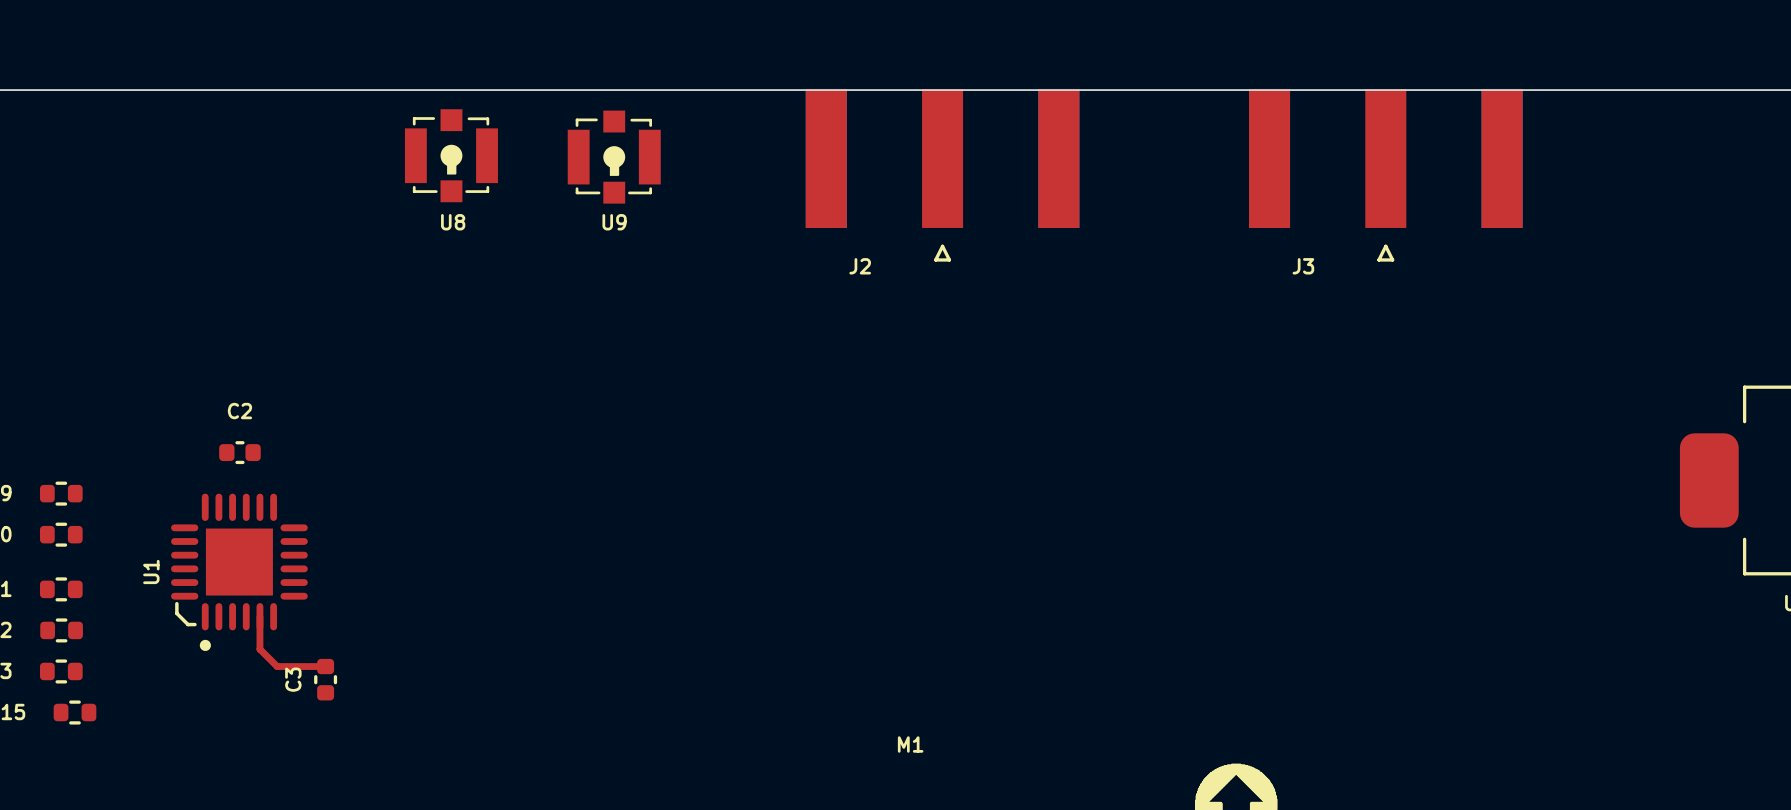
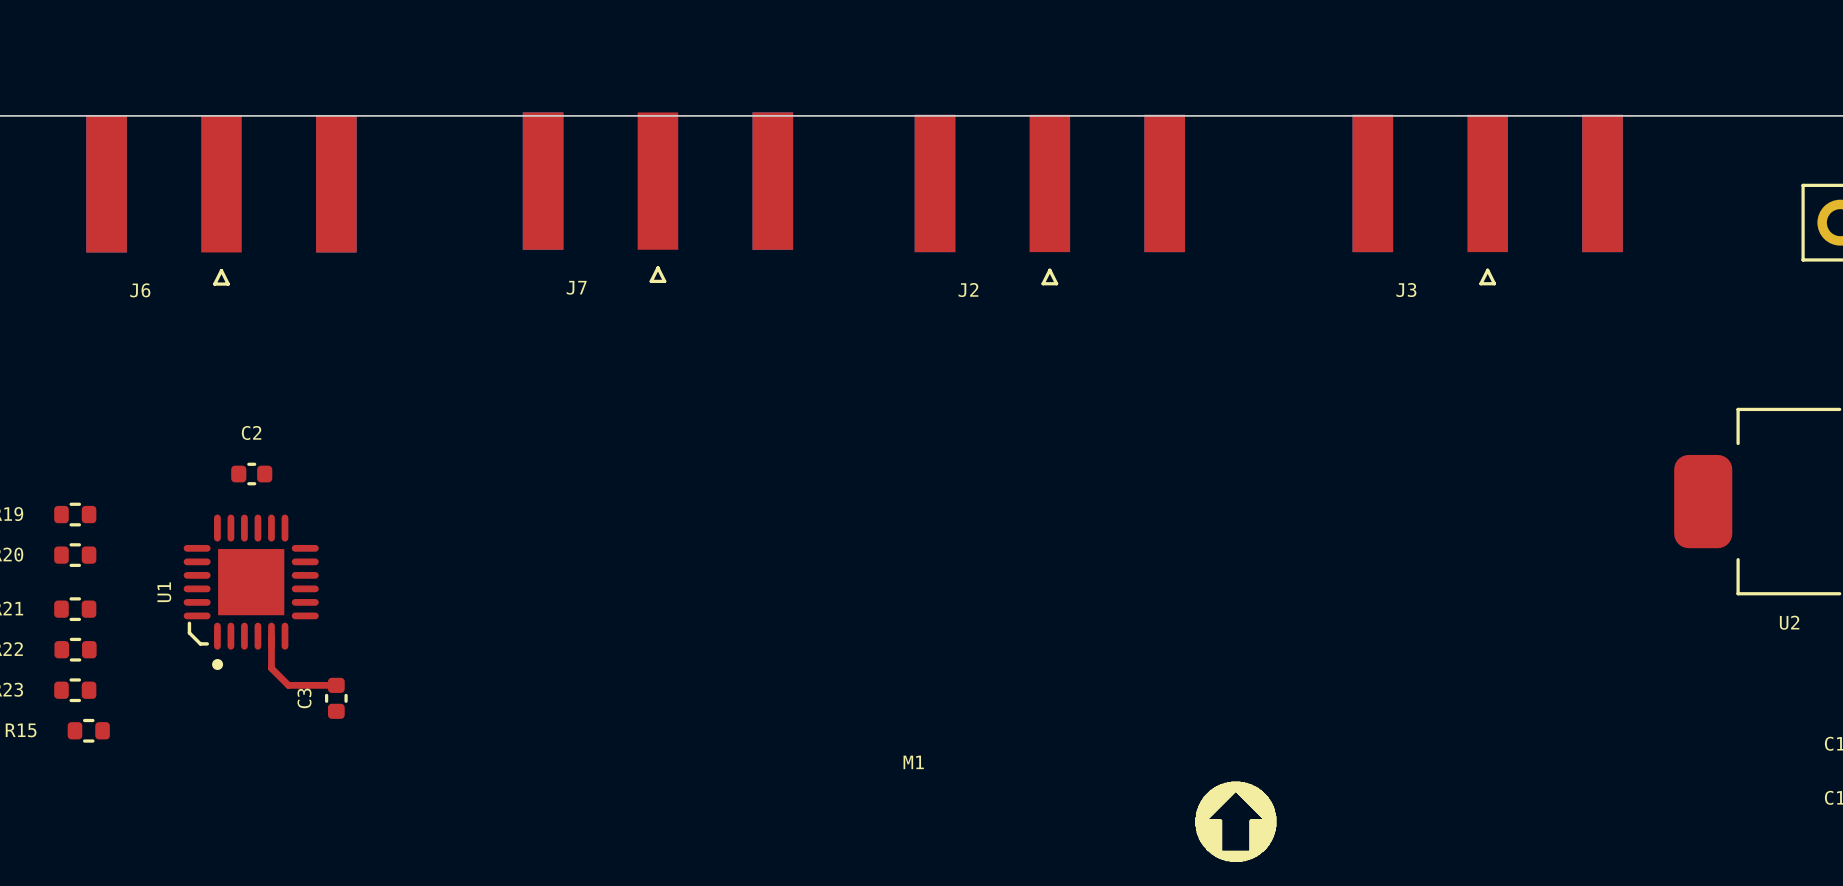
U8: (451, 155) -> none
U9: (614, 157) -> none
J7: none -> (657, 197)
J6: none -> (221, 200)
J2 position: (942, 175) -> (1049, 200)
J3 position: (1385, 175) -> (1487, 200)

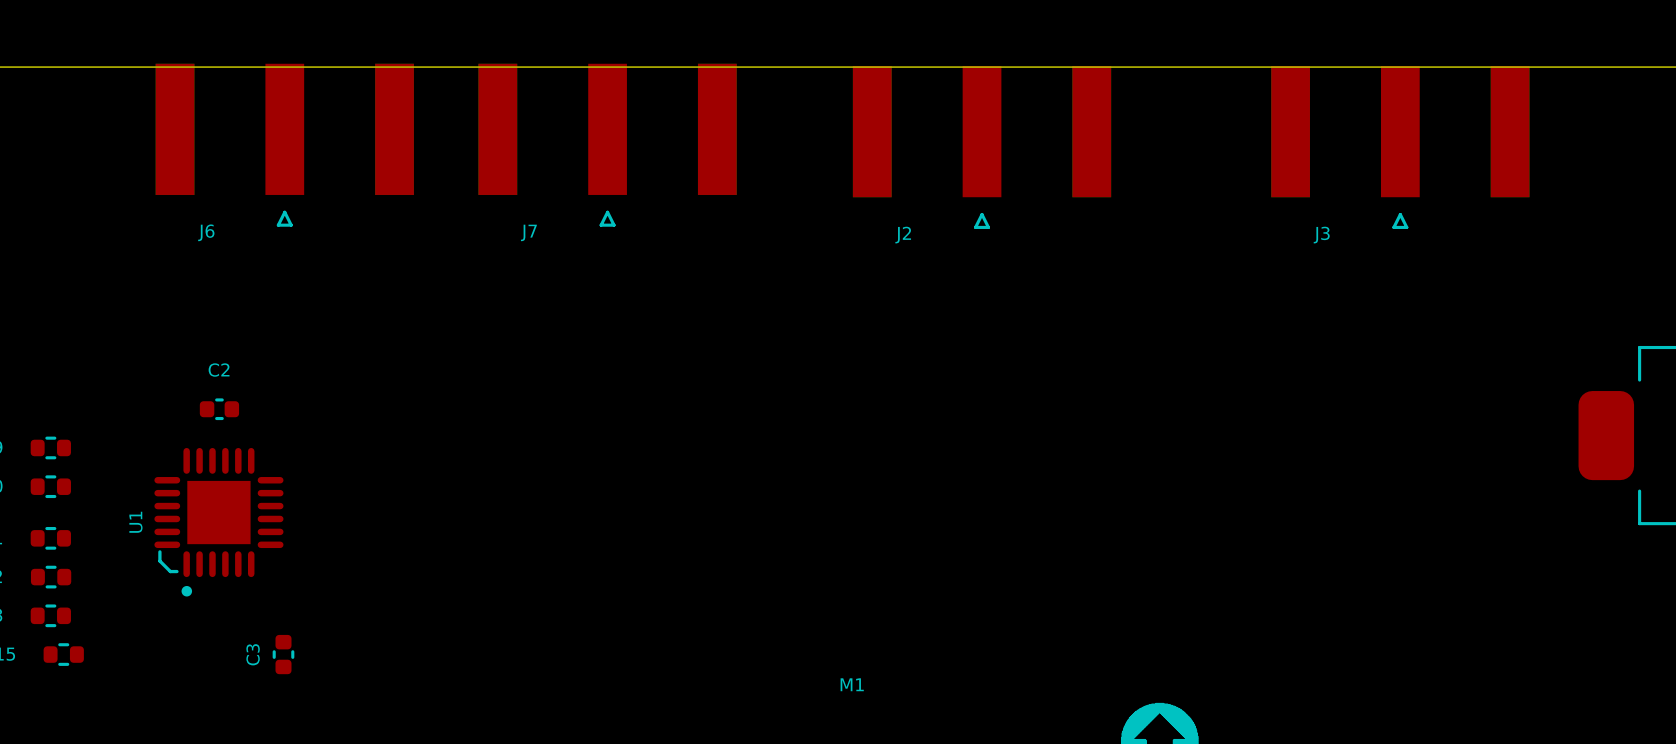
J6 position: (221, 200) -> (284, 145)
top track: (271, 636) (271, 668) (288, 685) (336, 685) -> none
C3 position: (336, 698) -> (283, 654)

